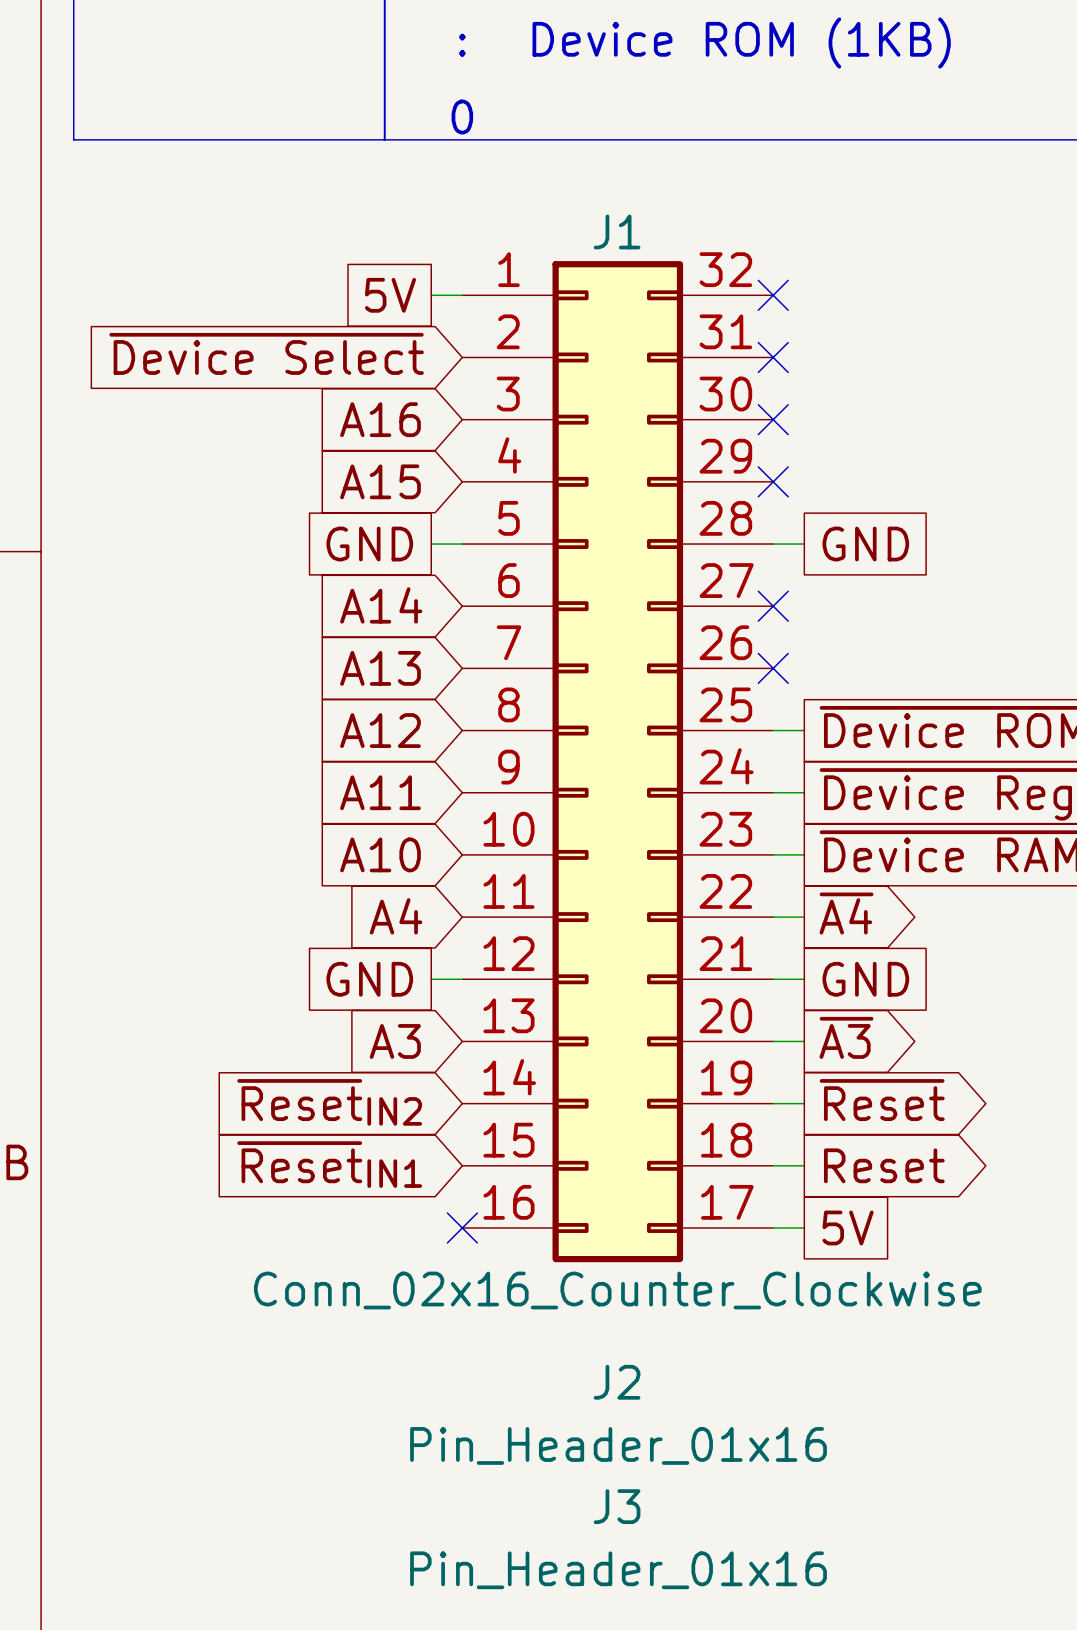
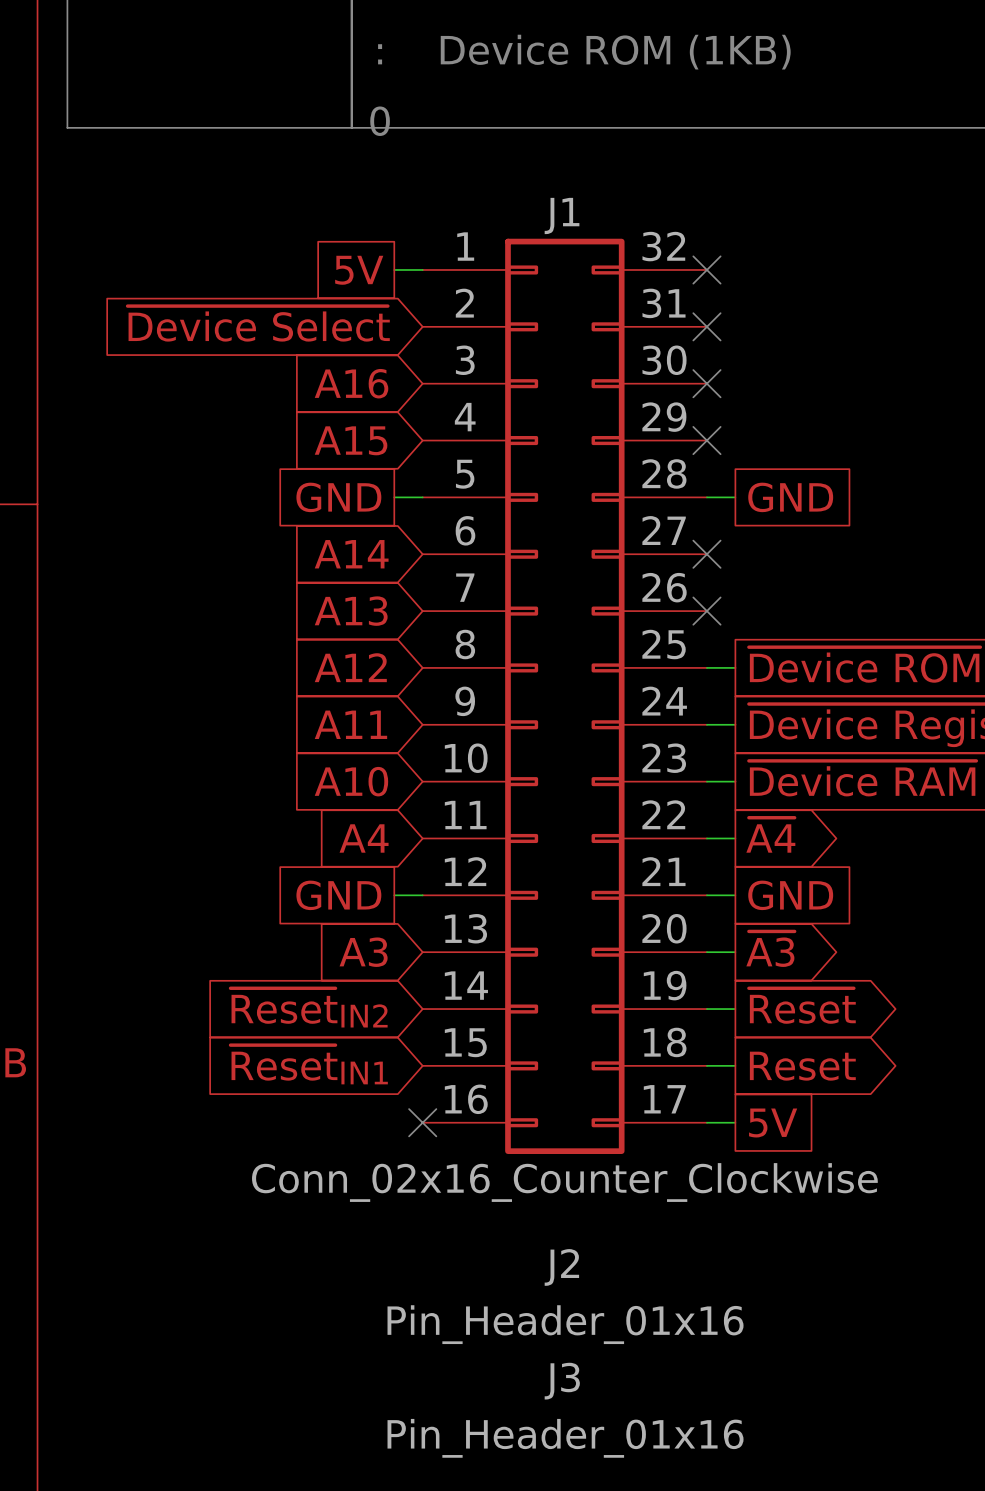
text position: Device ROM (1KB) (741, 43) -> Device ROM (1KB) (615, 52)
text position: : (462, 45) -> : (380, 54)
text position: 0 (462, 117) -> 0 (380, 121)

